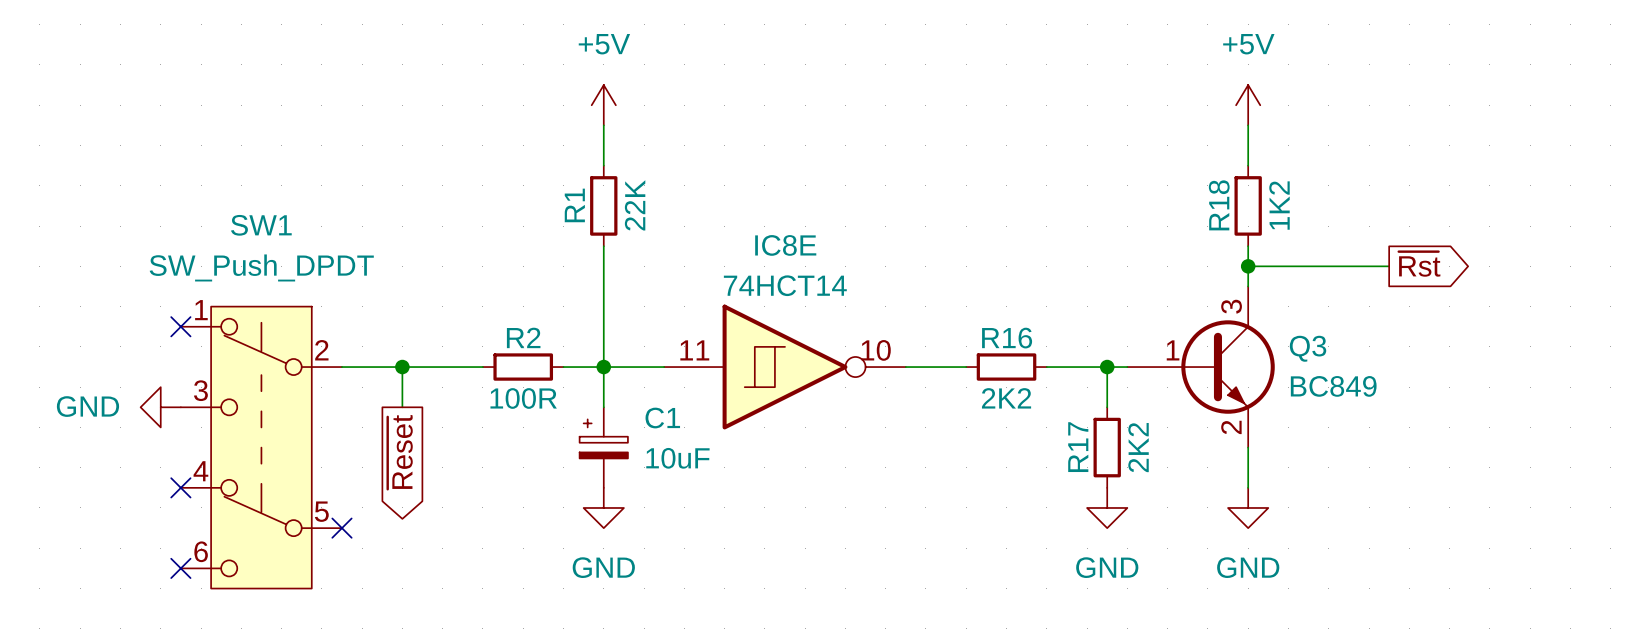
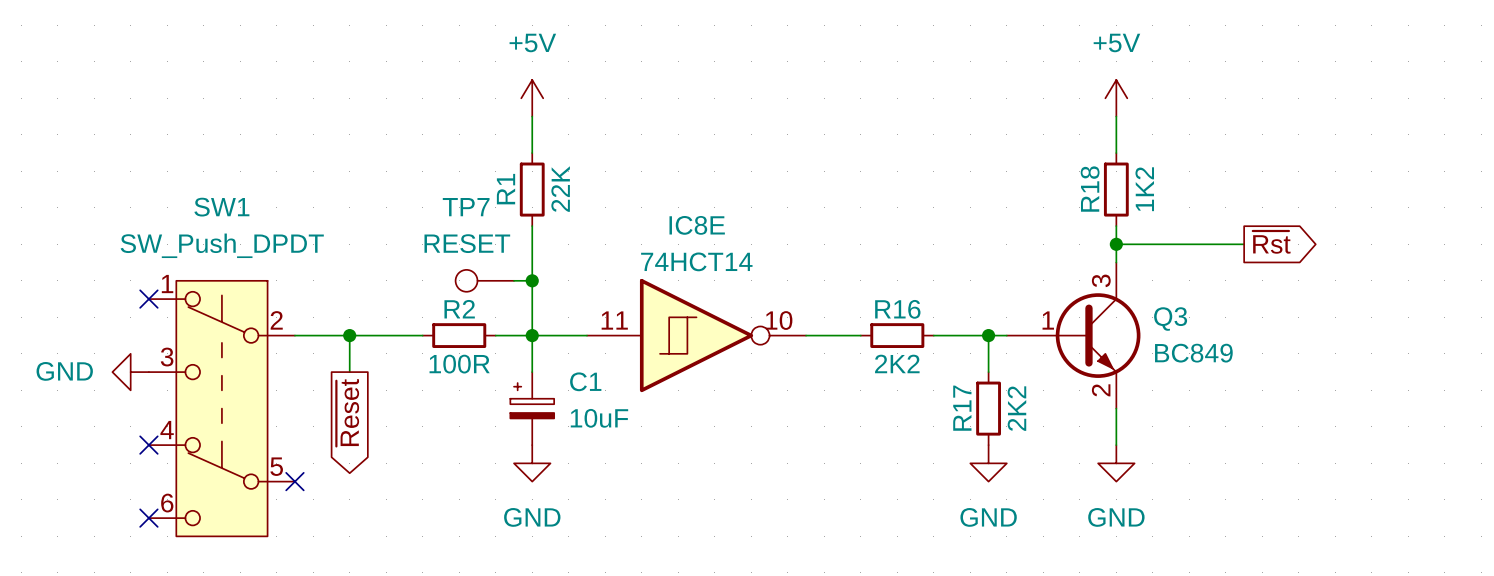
TP7: none -> RESET (484, 280)
wire: none -> (513, 280) (532, 280)
junction: none -> (532, 280)

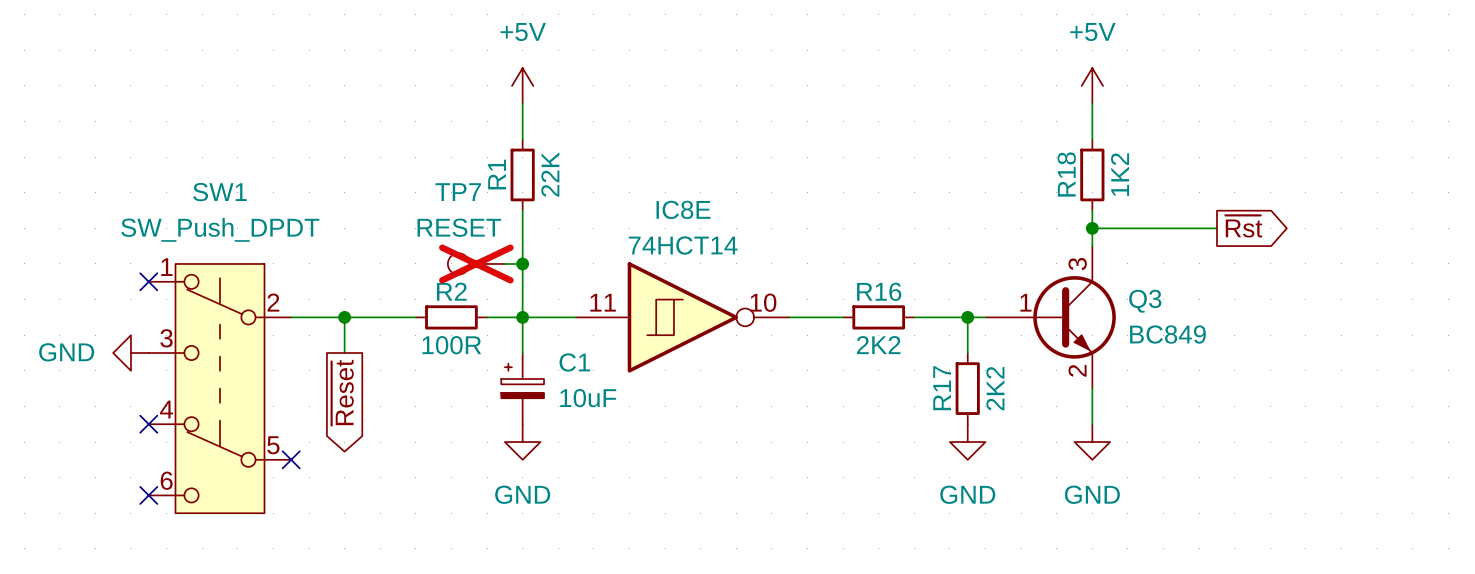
TP7 do-not-place cross: none -> (476, 263)

